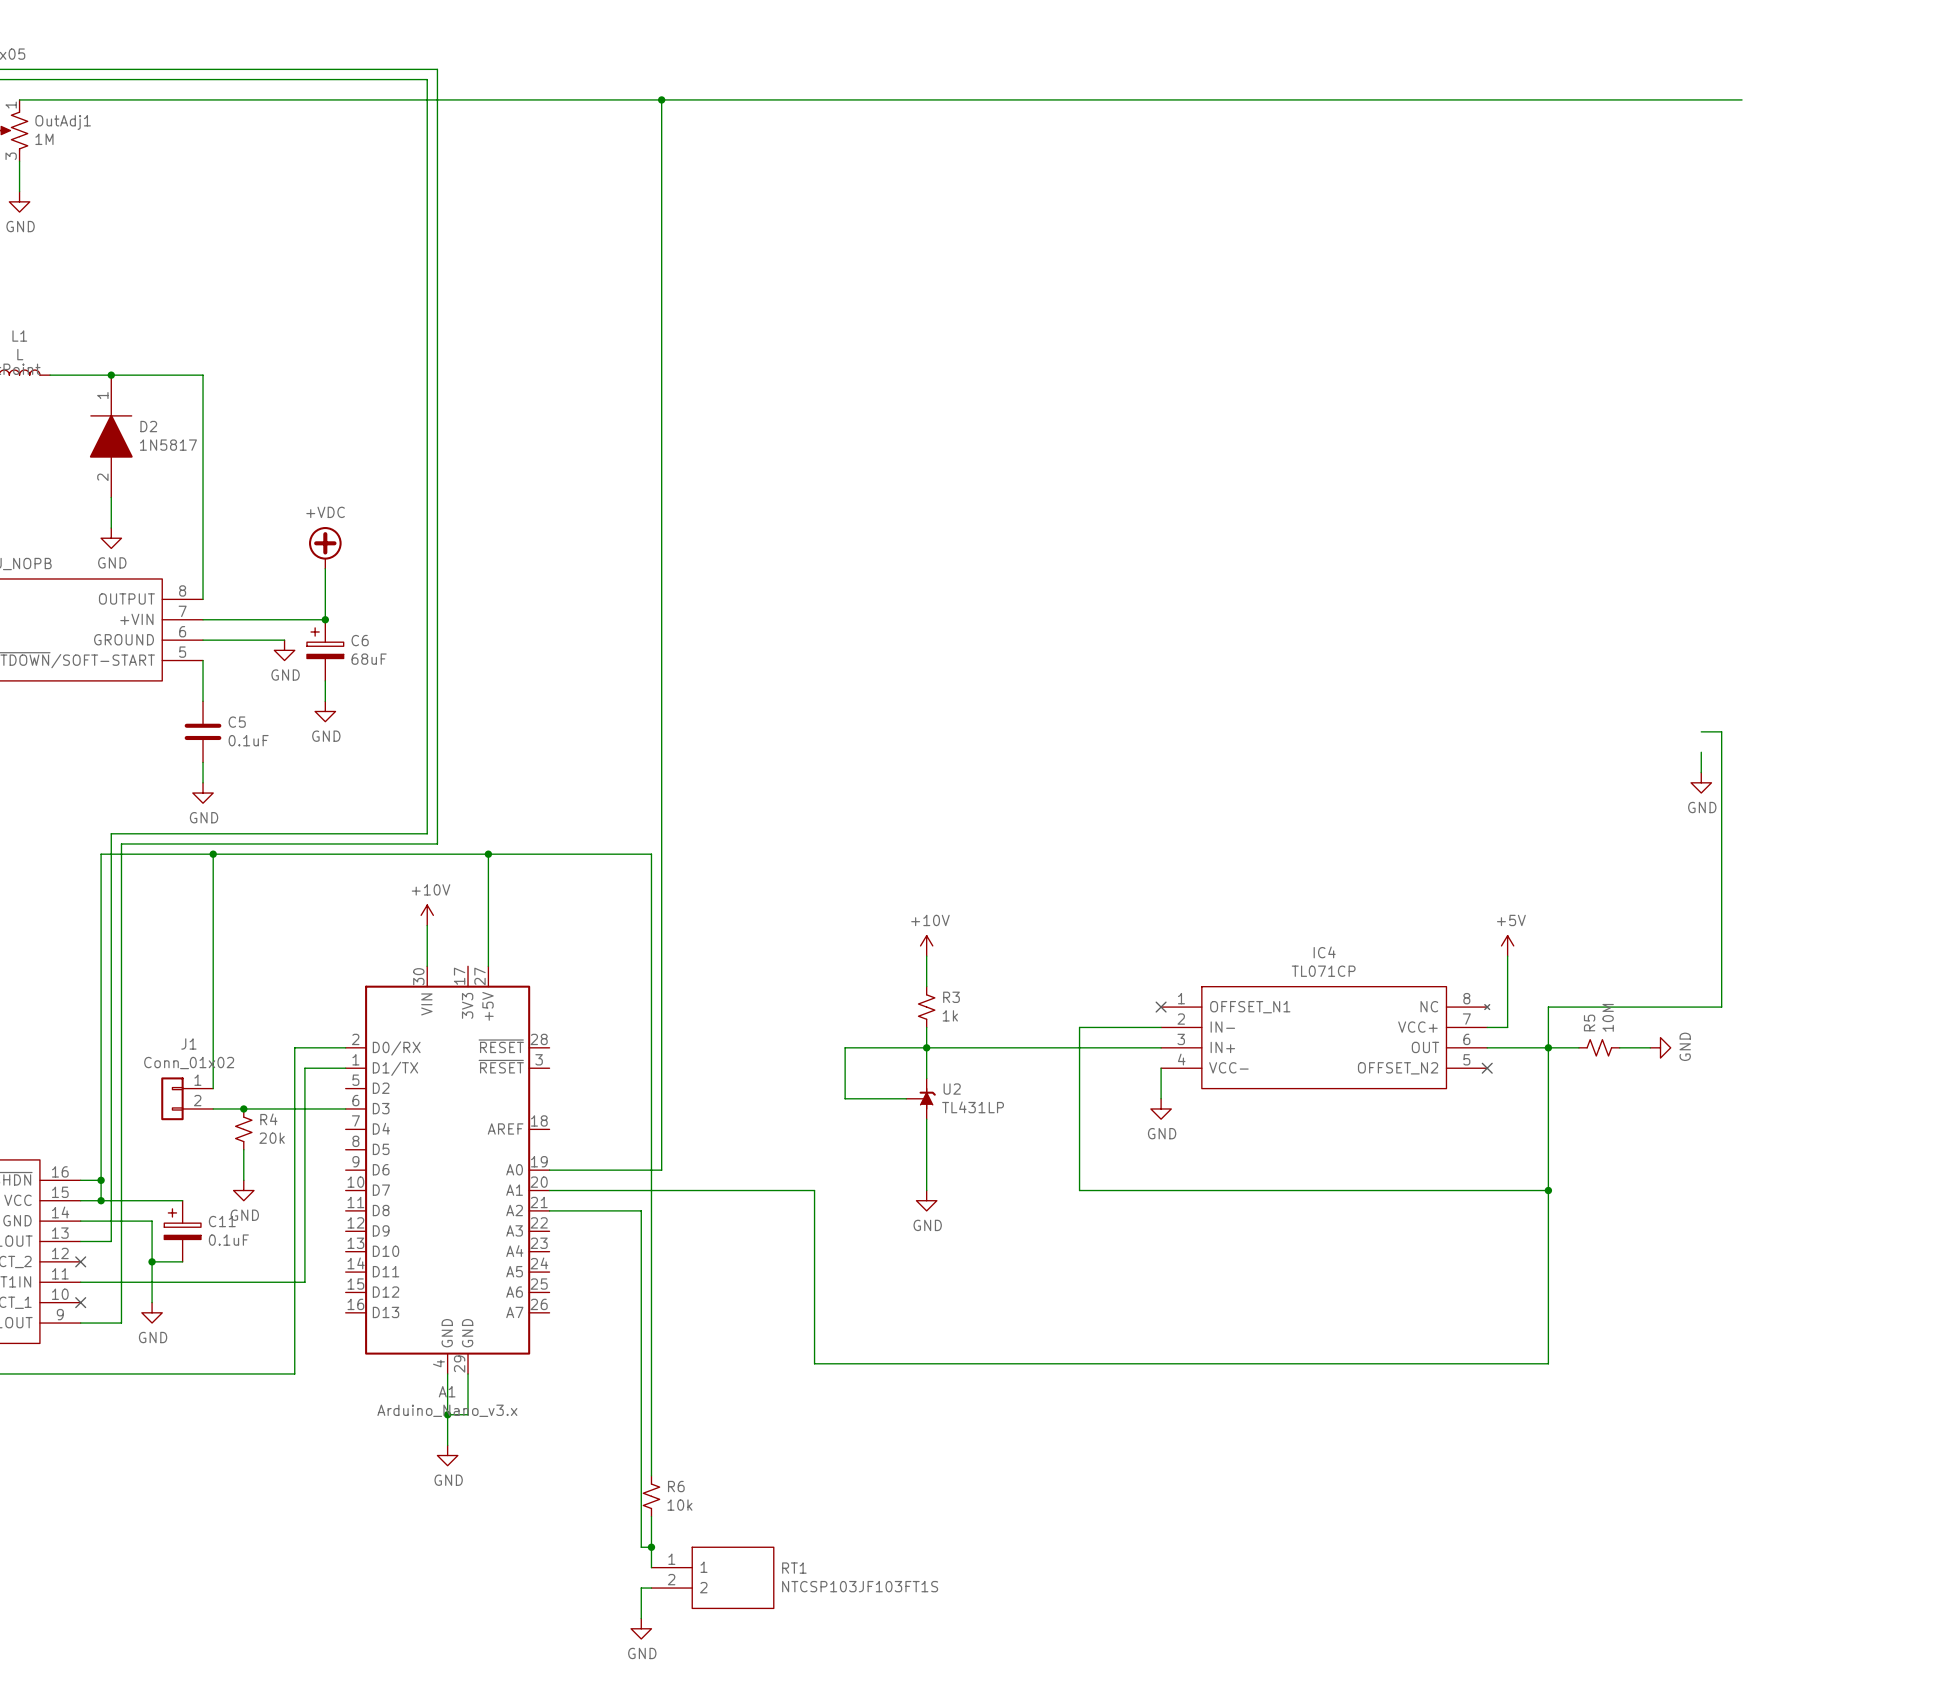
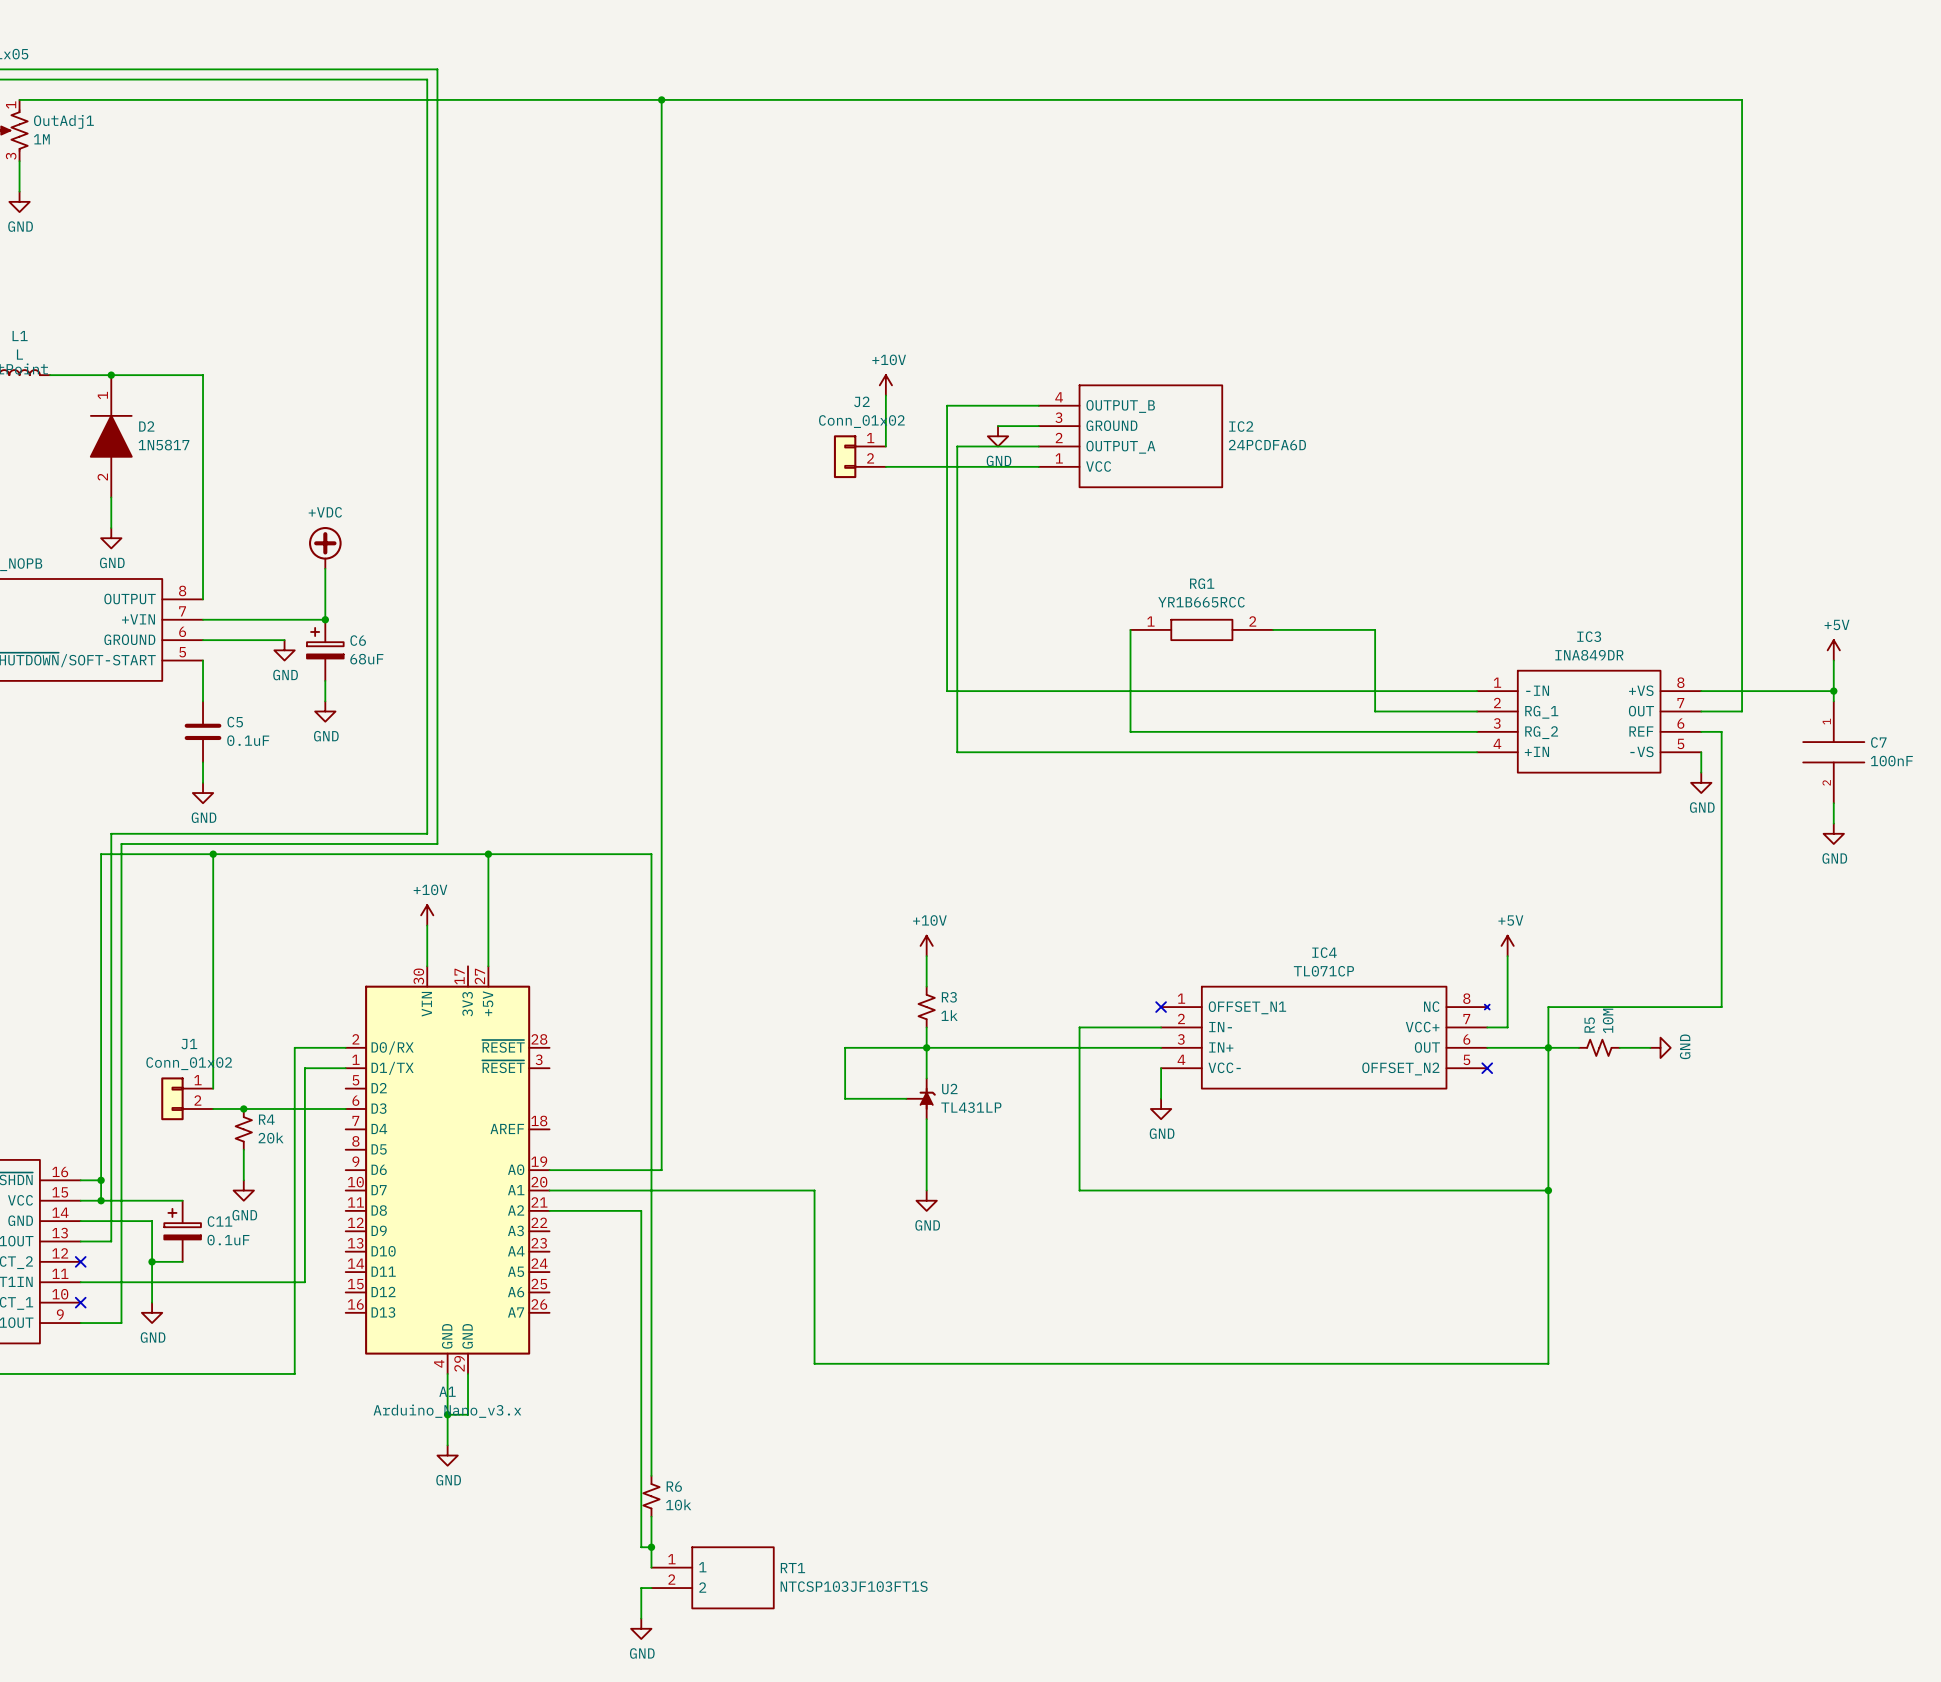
wire: none -> (1742, 99) (1742, 711) (1701, 711)
power symbol: none -> +10V (885, 385)
wire: none -> (885, 395) (885, 446)
wire: none -> (1038, 405) (947, 405) (947, 691) (1477, 691)
wire: none -> (998, 426) (1038, 426)
power symbol: none -> GND (998, 436)
IC2: none -> 24PCDFA6D (1130, 436)
wire: none -> (1038, 446) (957, 446) (957, 752) (1477, 752)
J2: none -> Conn_01x02 (859, 456)
wire: none -> (885, 466) (1038, 466)
wire: none -> (1130, 629) (1130, 731) (1477, 731)
RG1: none -> YR1B665RCC (1201, 629)
wire: none -> (1273, 629) (1375, 629) (1375, 711) (1477, 711)
power symbol: none -> +5V (1833, 650)
wire: none -> (1833, 660) (1833, 701)
wire: none -> (1701, 691) (1833, 691)
junction: none -> (1833, 691)
IC3: none -> INA849DR (1589, 721)
C7: none -> 100nF (1833, 752)
wire: none -> (1833, 803) (1833, 823)
power symbol: none -> GND (1833, 833)

